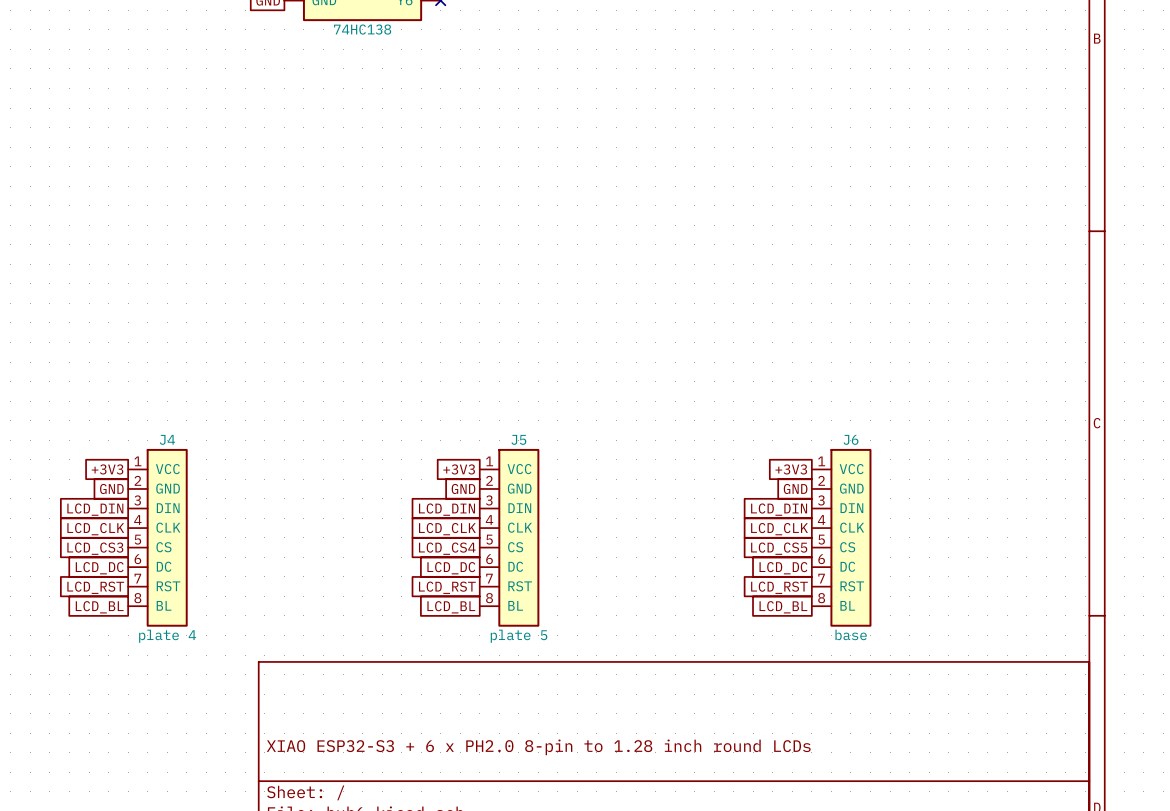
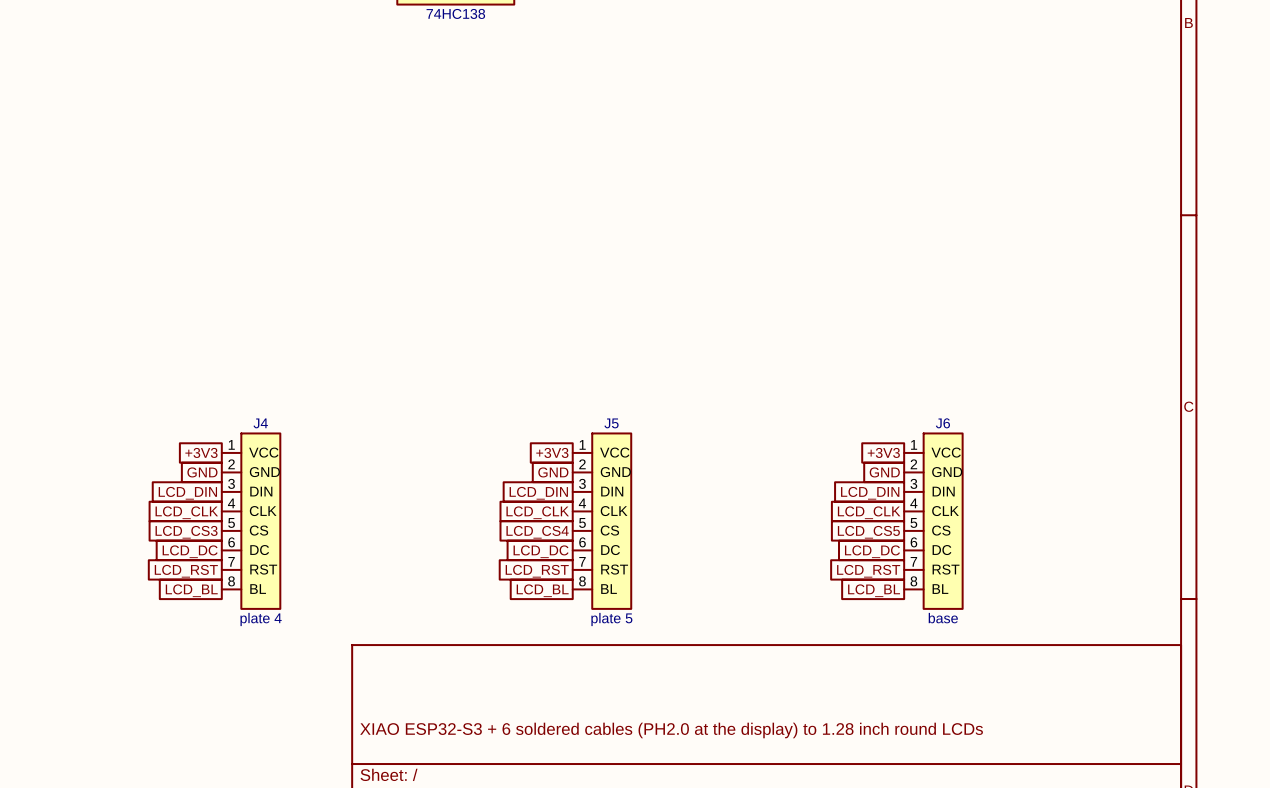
title block: XIAO ESP32-S3 + 6 x PH2.0 8-pin to 1.28 inch round LCDs (538, 747) -> XIAO ESP32-S3 + 6 soldered cables (PH2.0 at the display) to 1.28 inch round LCDs (671, 730)

